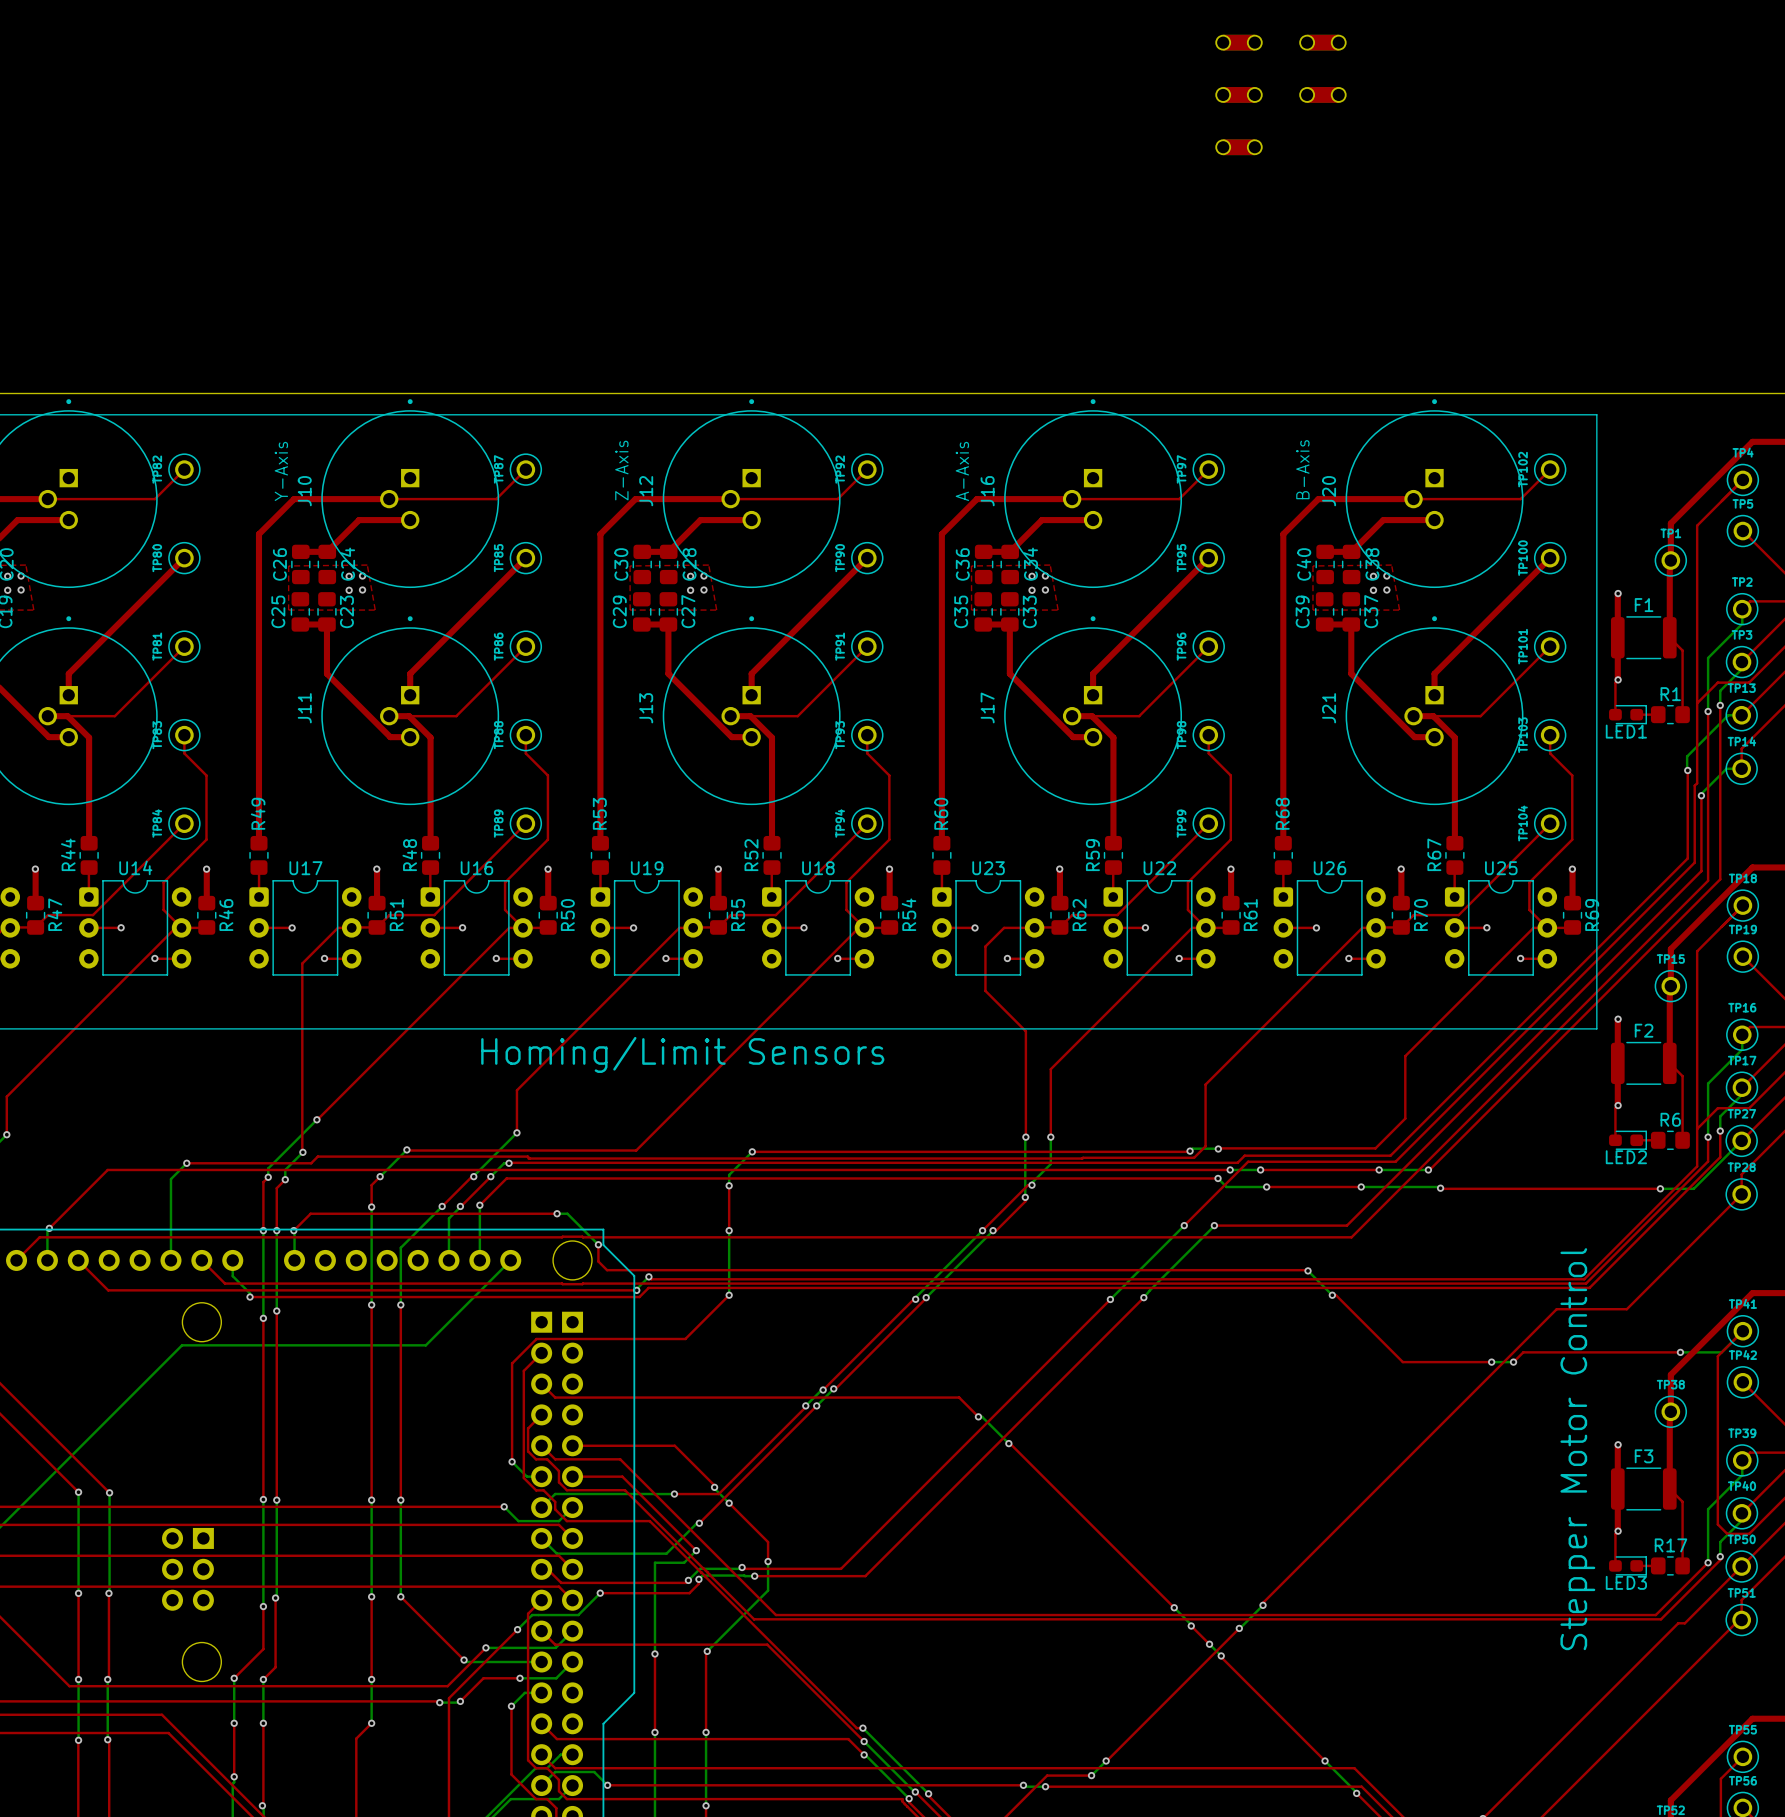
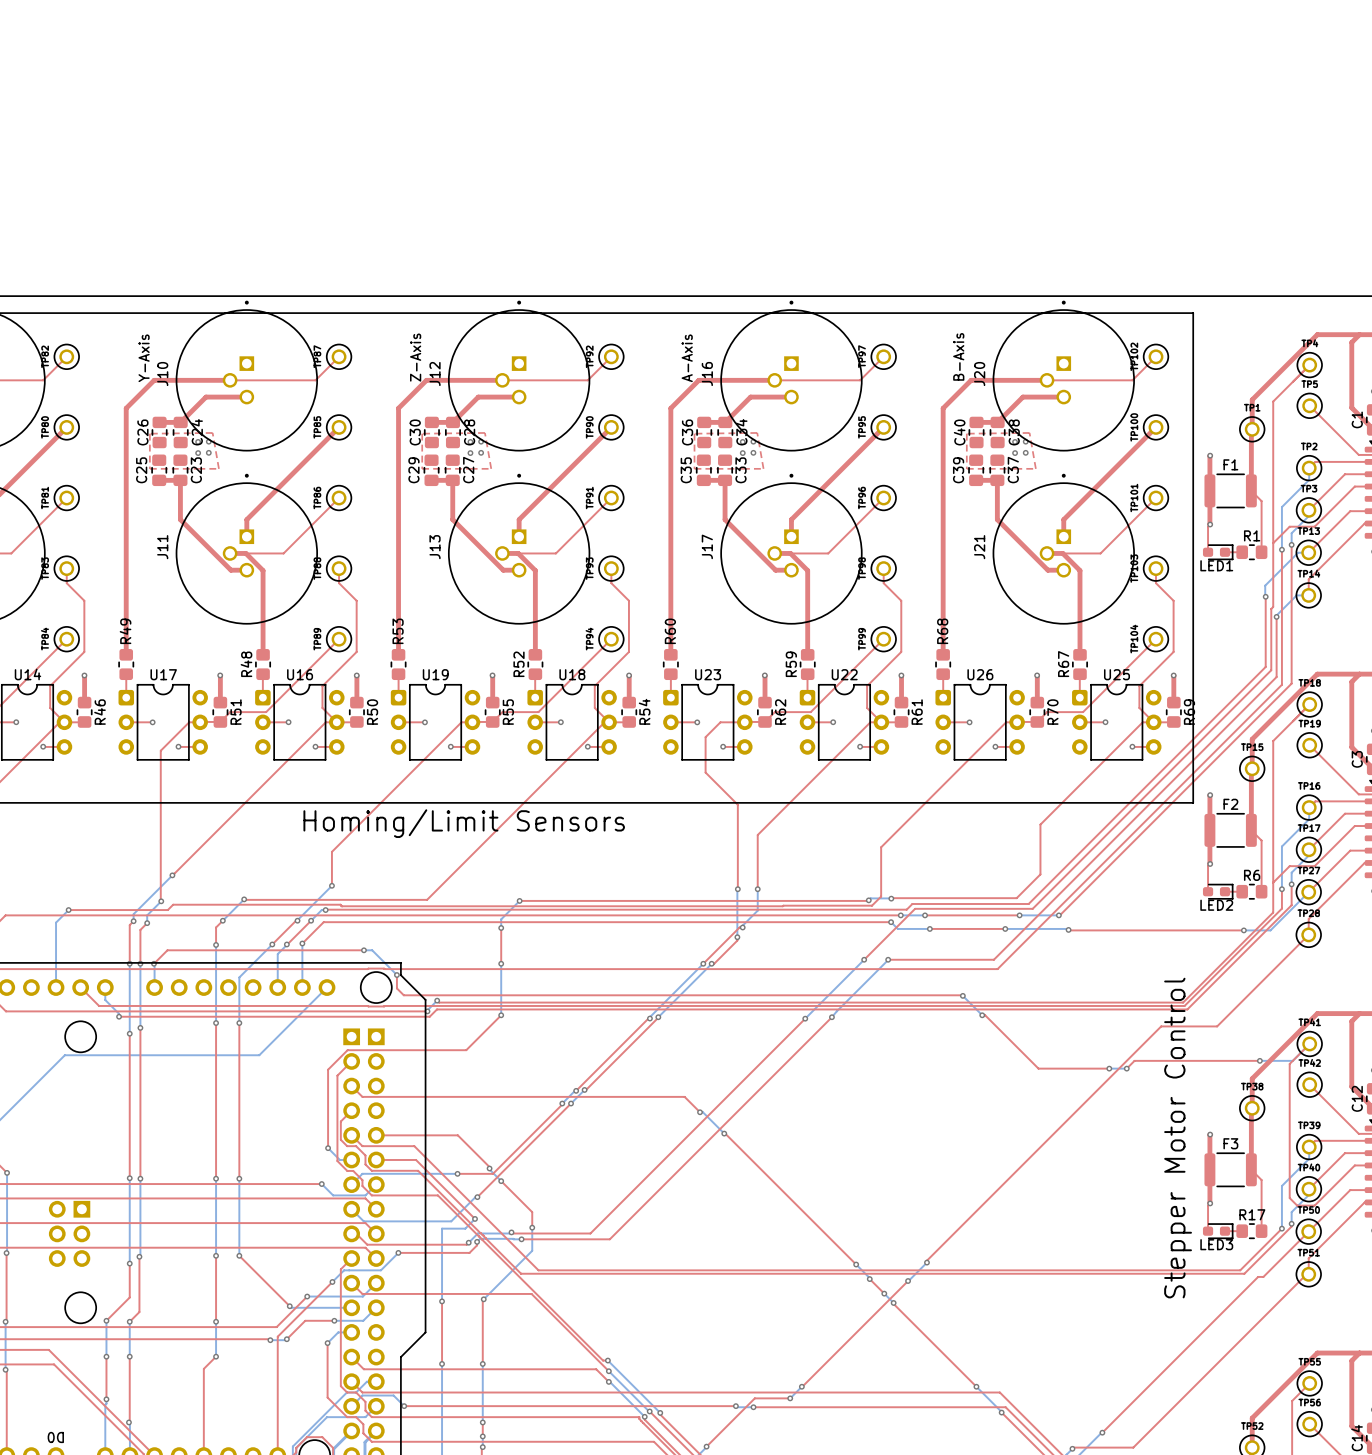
part: (1239, 42) -> none
part: (1322, 42) -> none
part: (1239, 94) -> none
part: (1322, 94) -> none
part: (1239, 147) -> none

